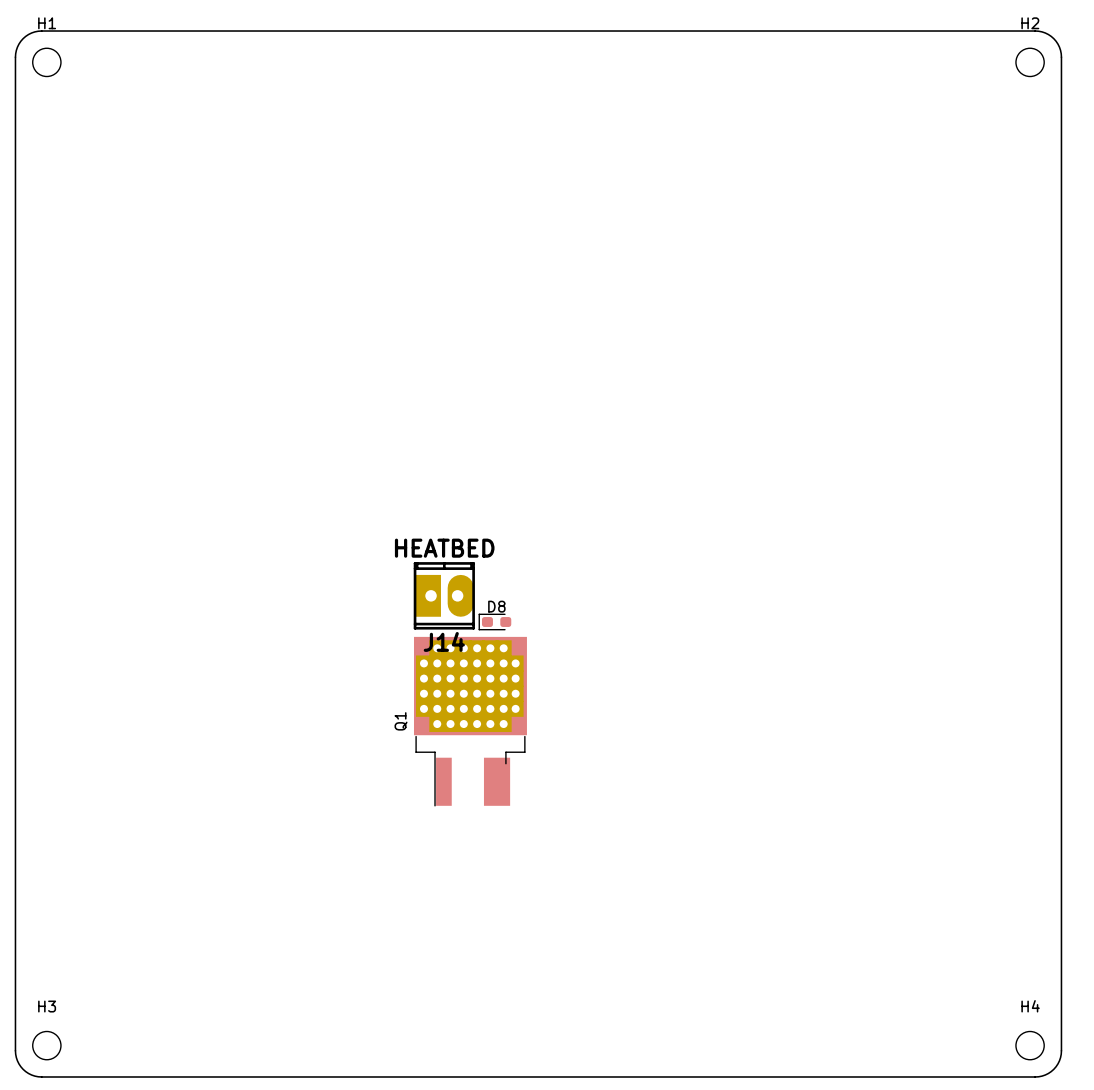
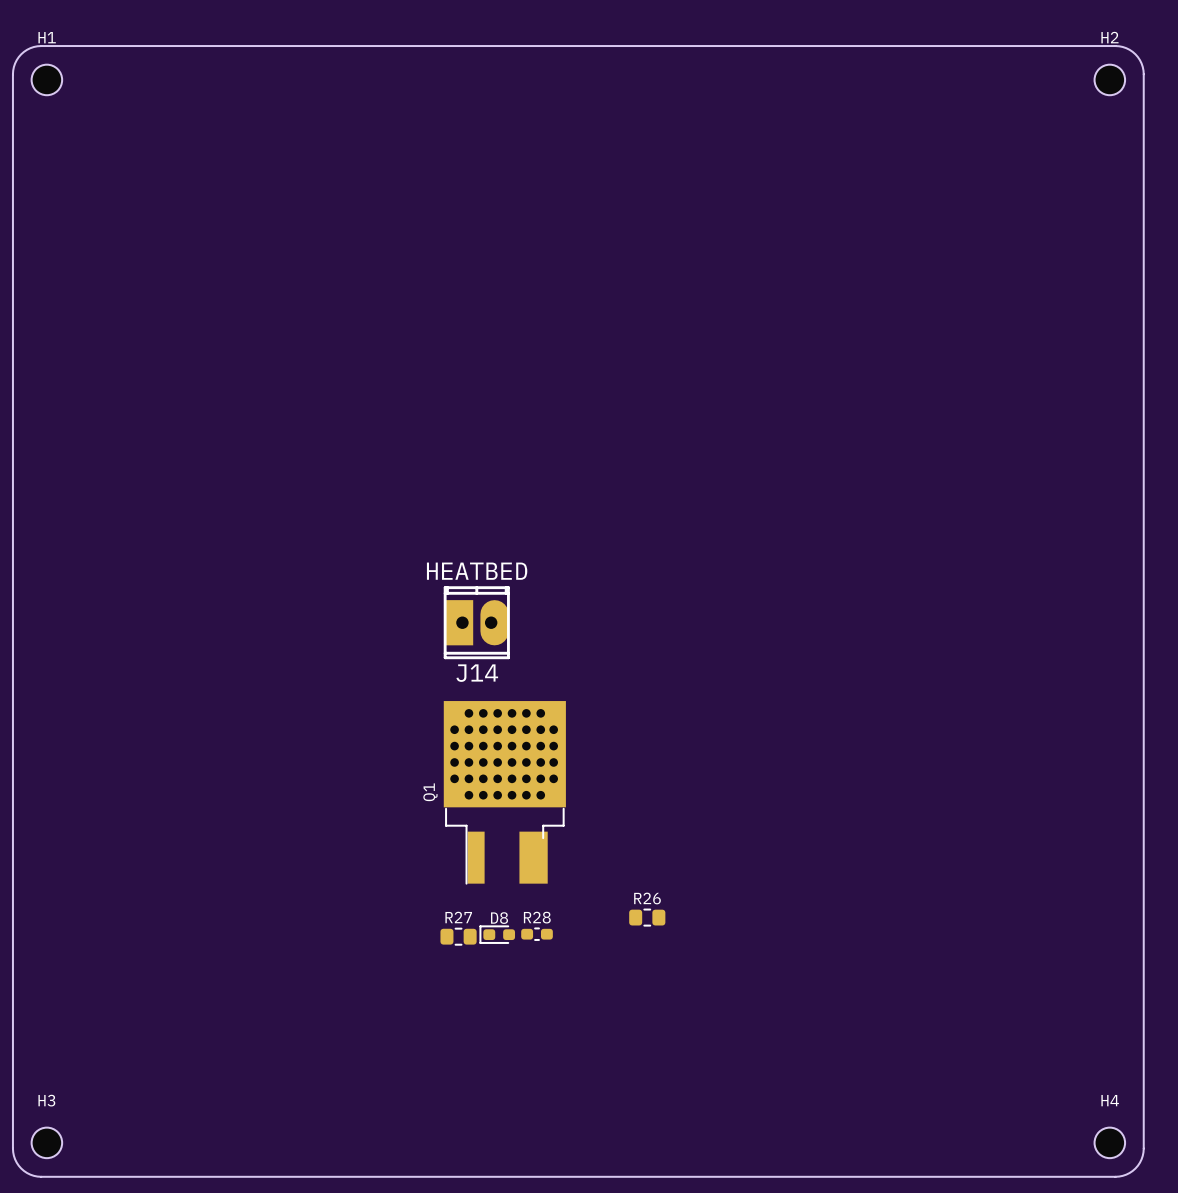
J14 position: (444, 595) -> (476, 622)
D8 position: (494, 621) -> (497, 934)
R26: none -> (647, 917)
R28: none -> (537, 934)
R27: none -> (458, 936)

